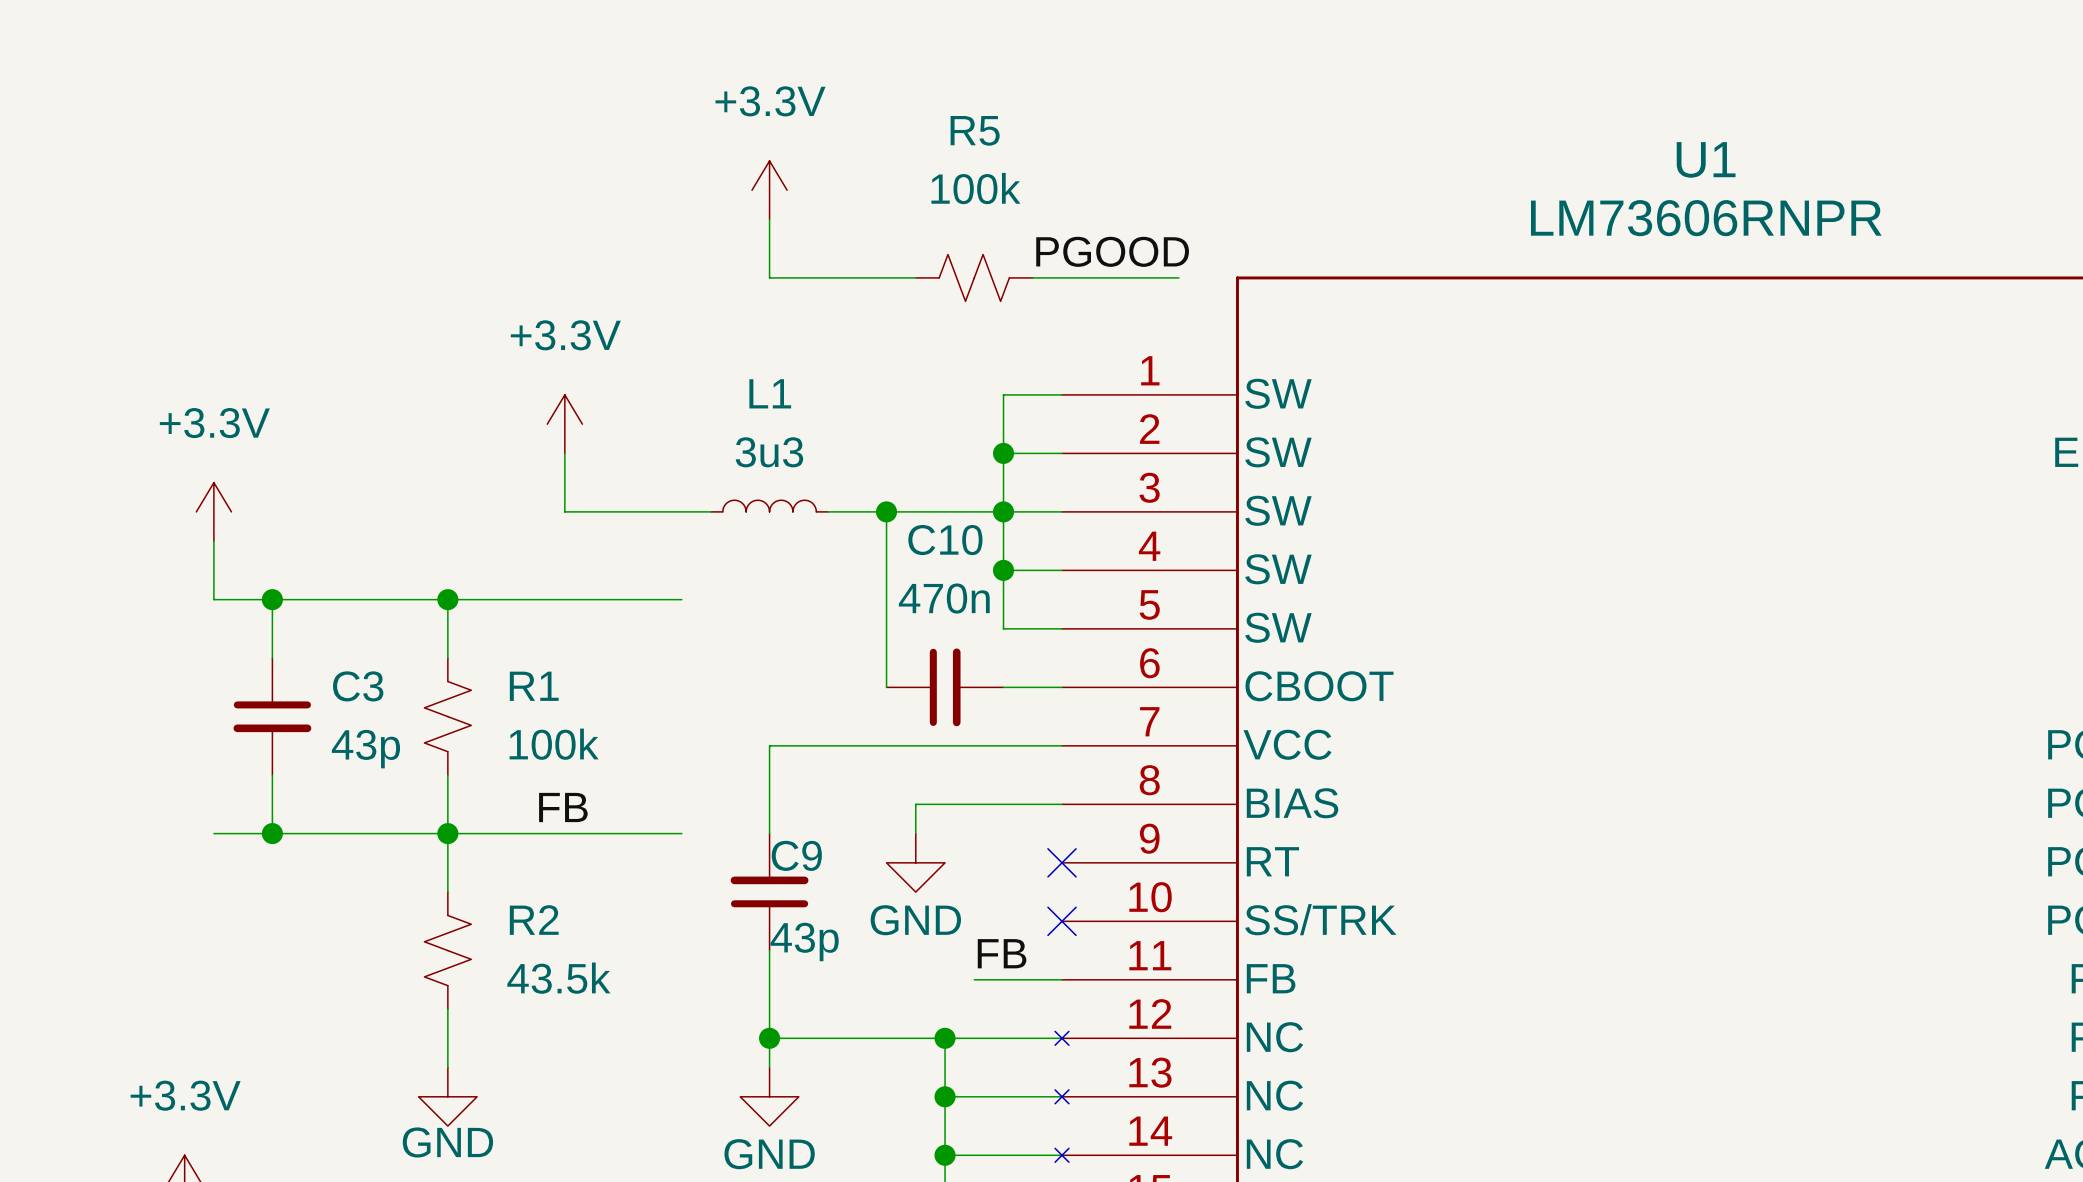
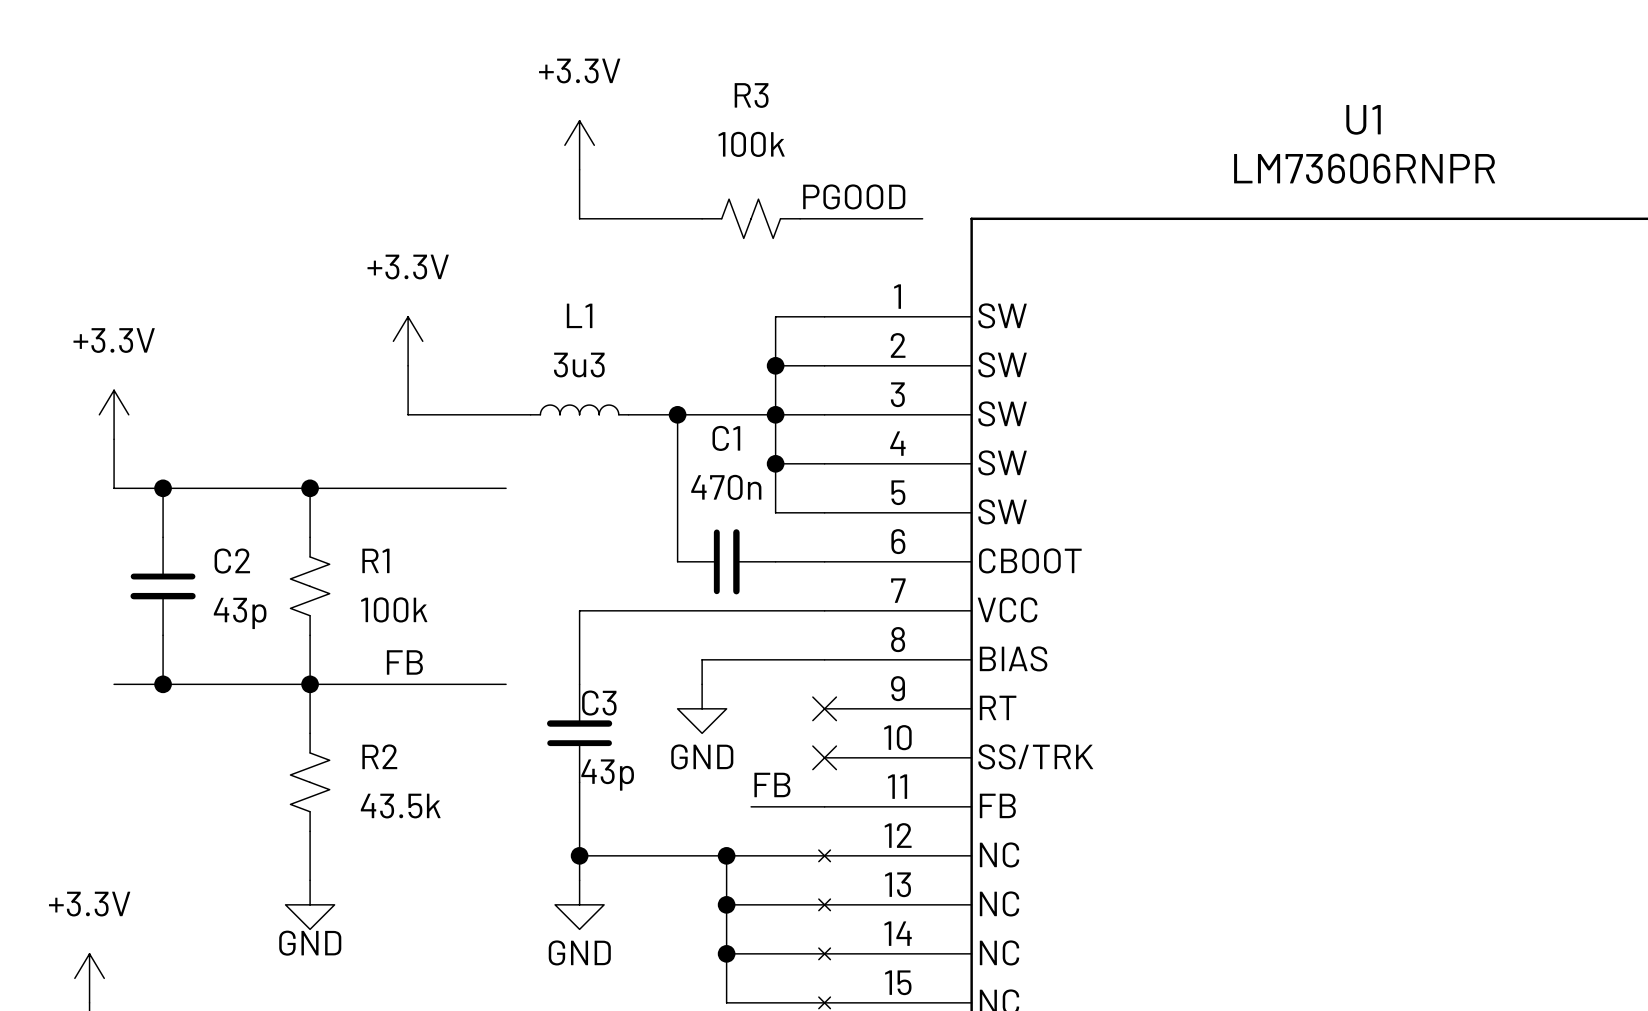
R5 name: R5 (975, 130) -> R3 (751, 95)
C10 name: C10 (945, 540) -> C1 (726, 438)
C3 name: C3 (358, 686) -> C2 (232, 561)
C9 name: C9 (796, 855) -> C3 (599, 703)

